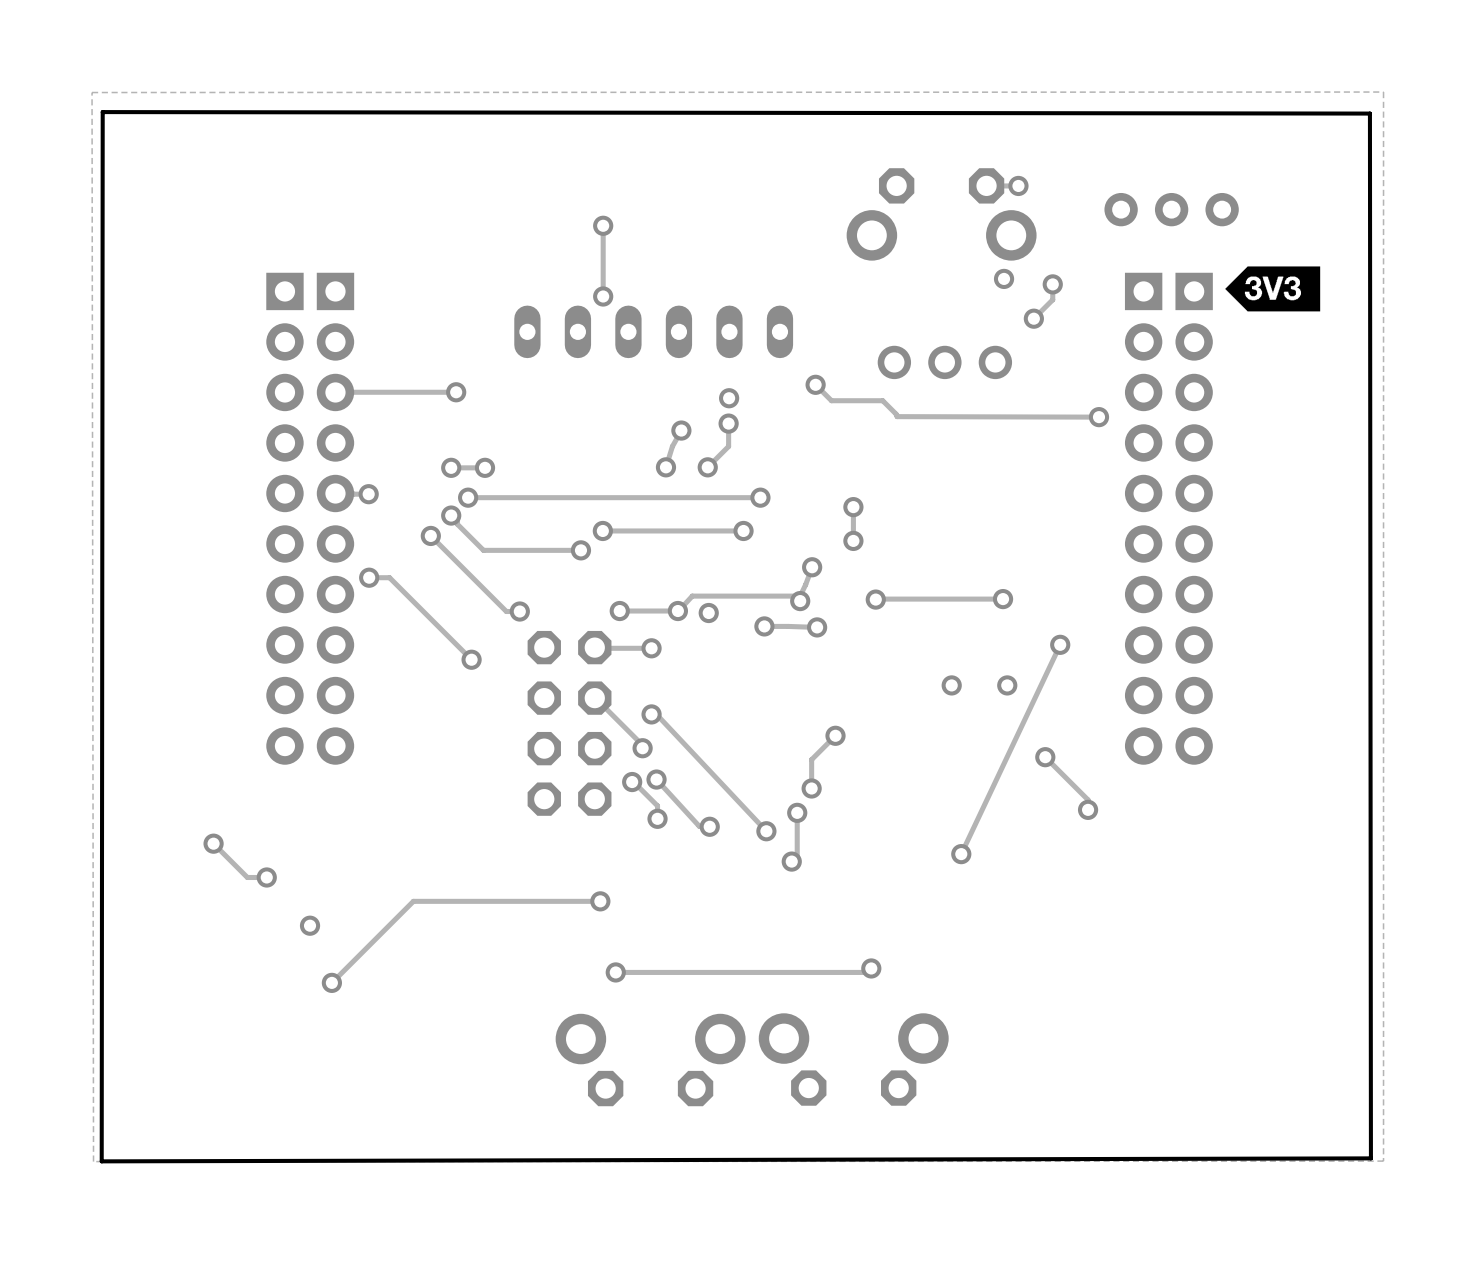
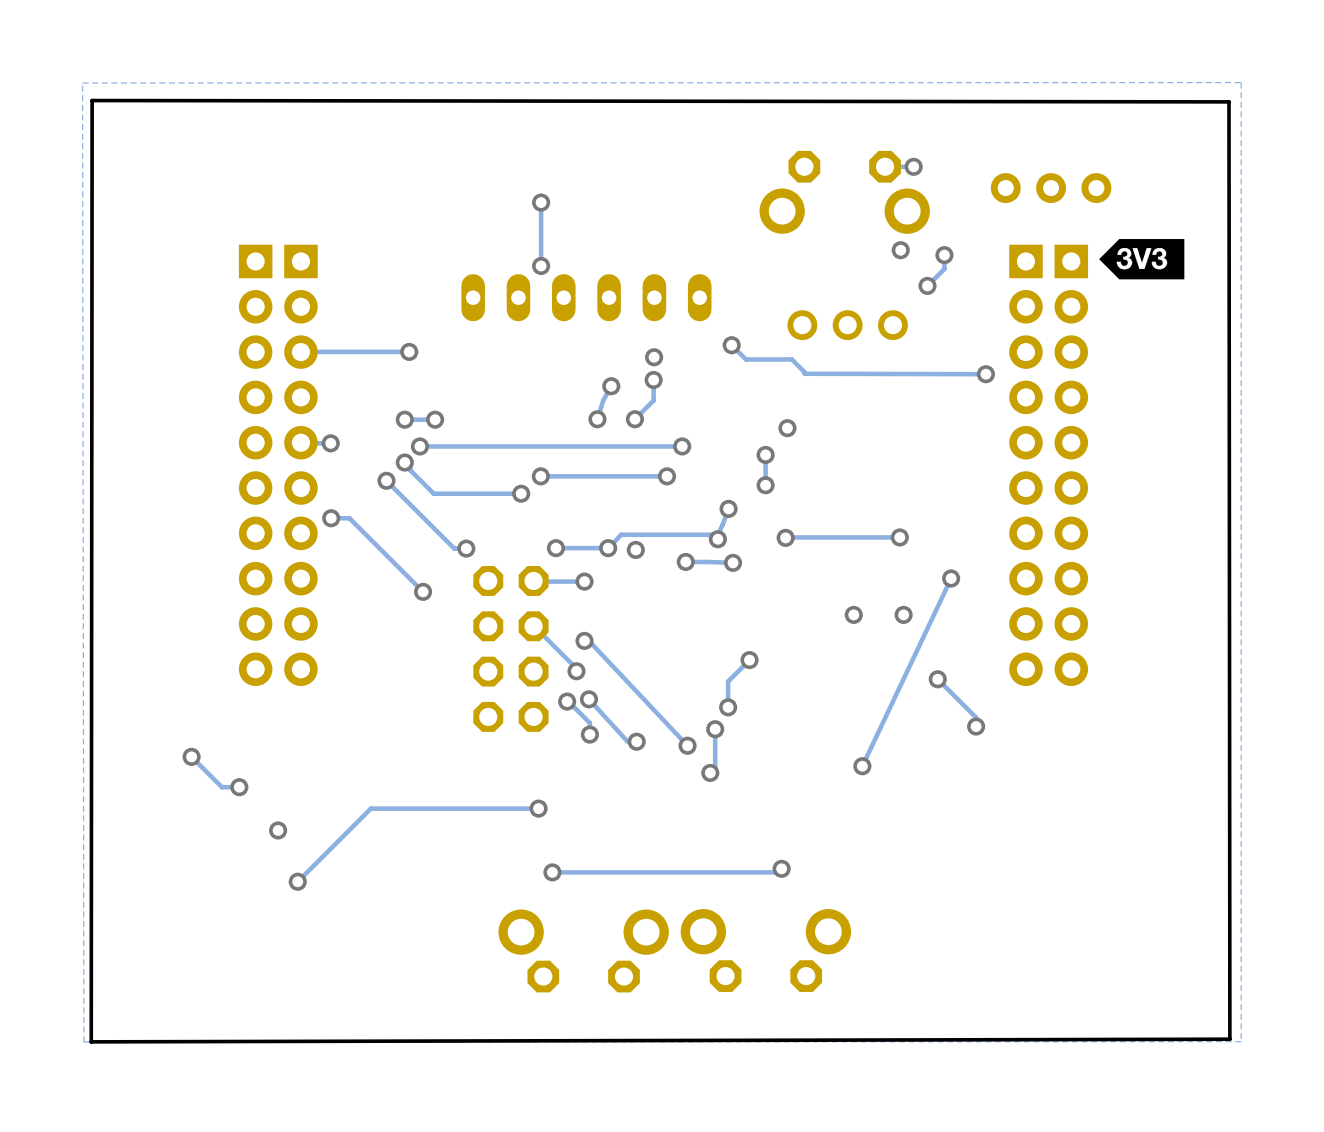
via: none -> (787, 428)

